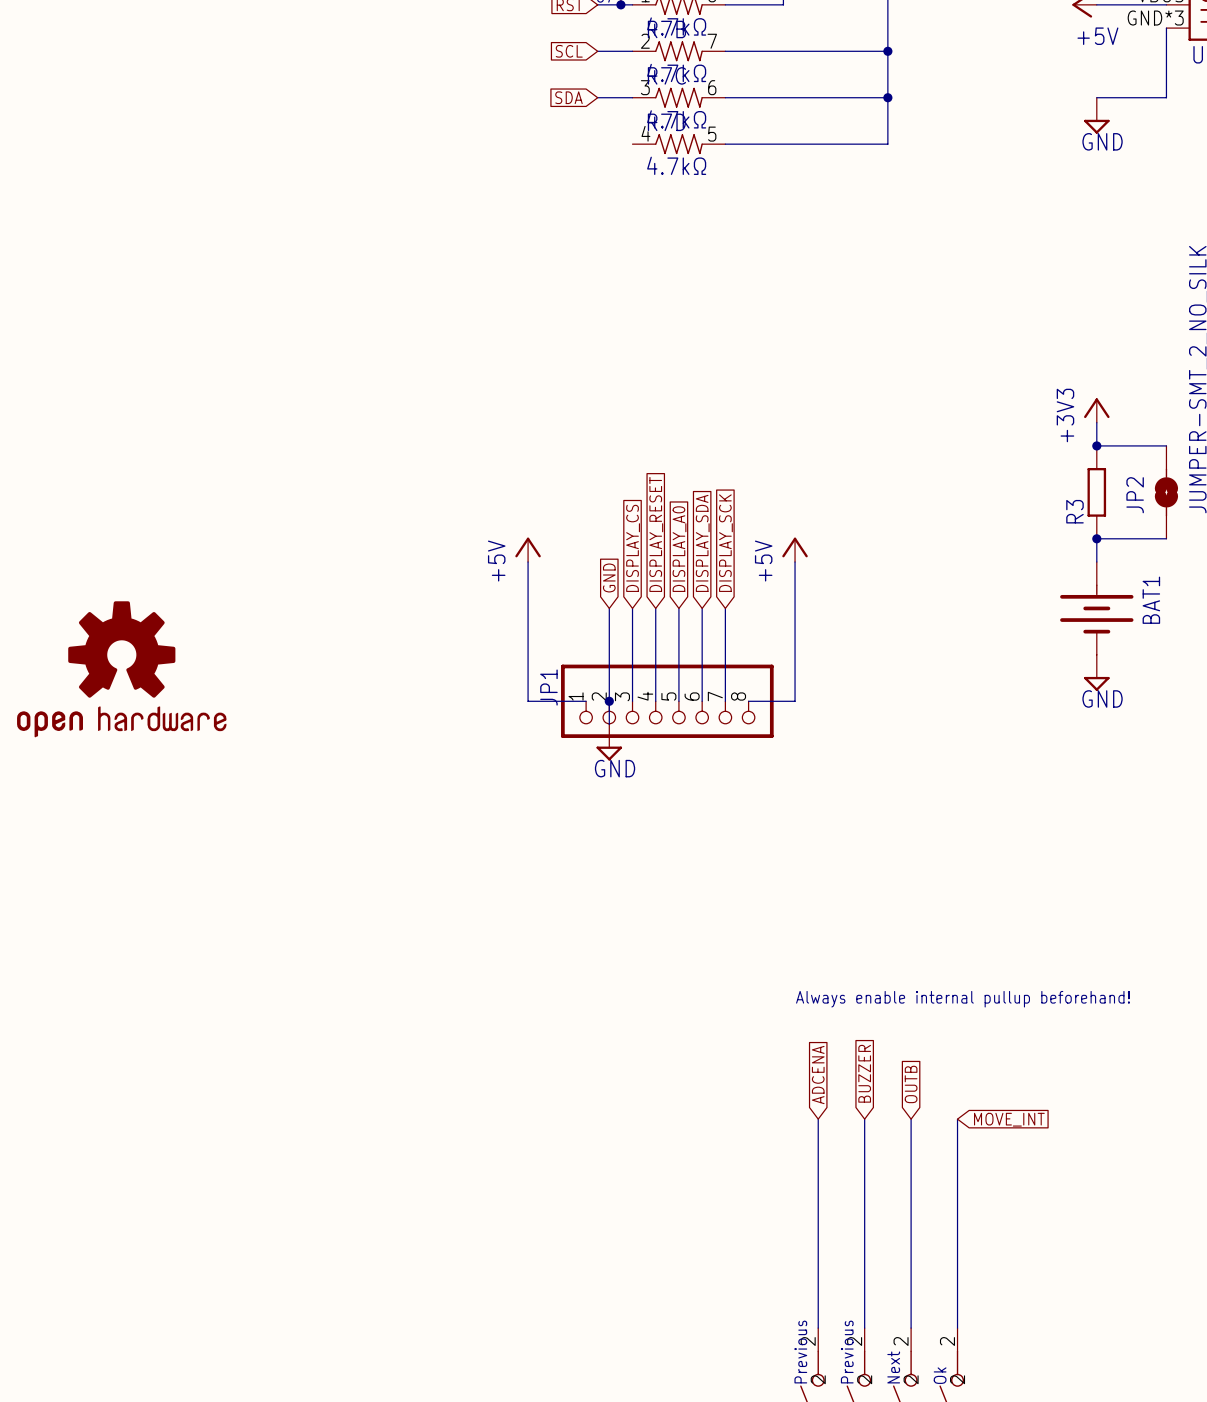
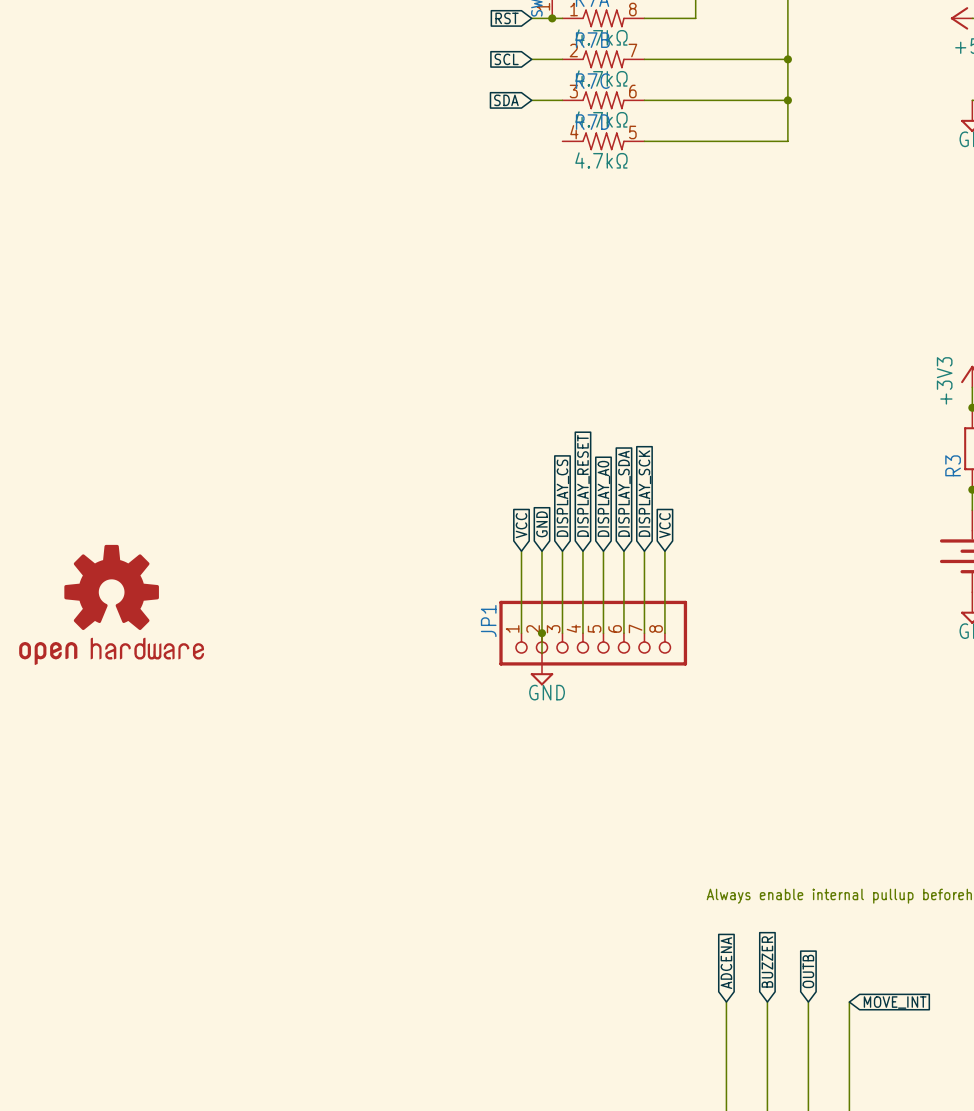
power symbol: +5V (528, 549) -> none
power symbol: +5V (795, 549) -> none
wire: (528, 562) (528, 701) (586, 701) -> (521, 551) (521, 633)
wire: (795, 562) (795, 701) (748, 701) -> (664, 551) (664, 633)
global label: none -> VCC (521, 525)
global label: none -> VCC (664, 525)

